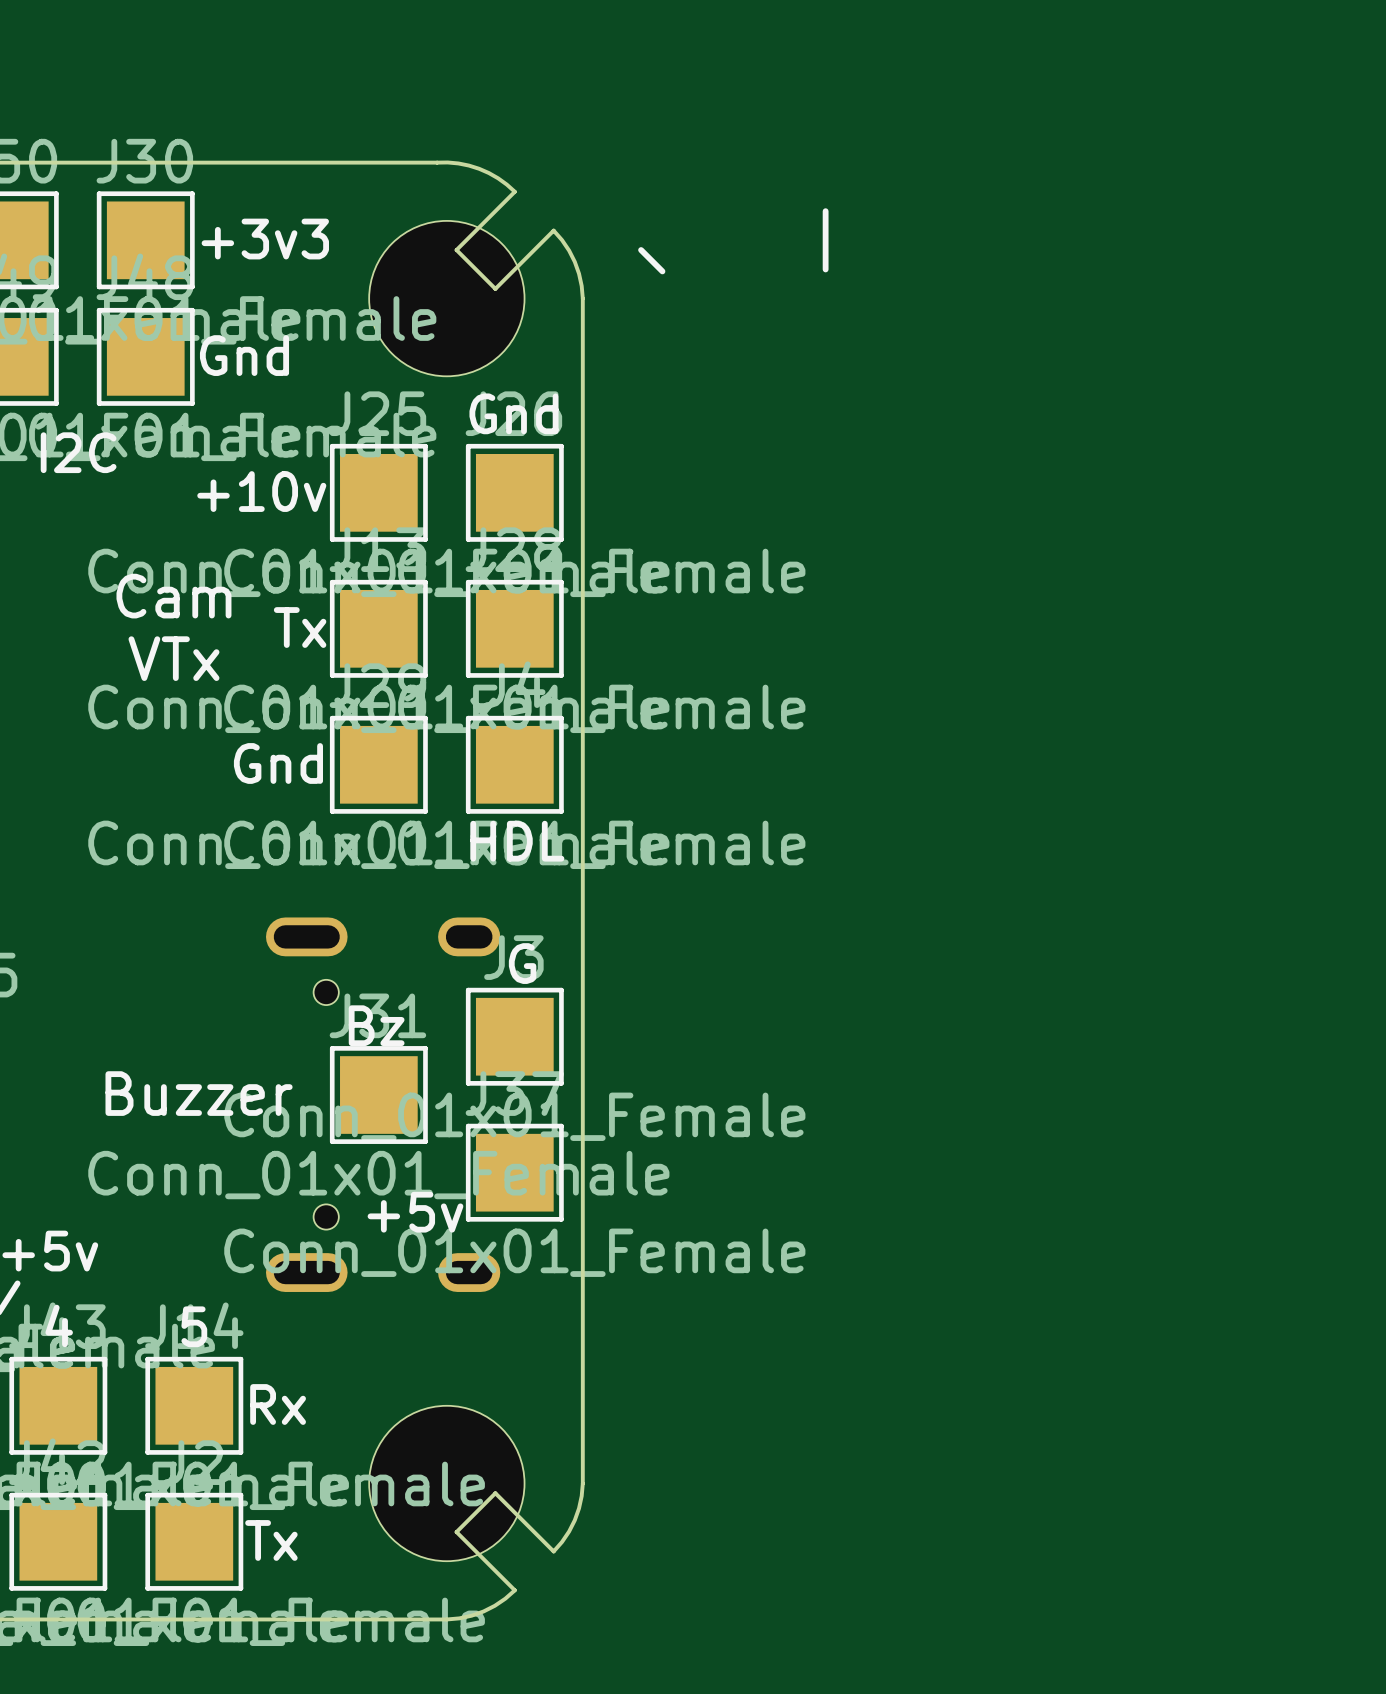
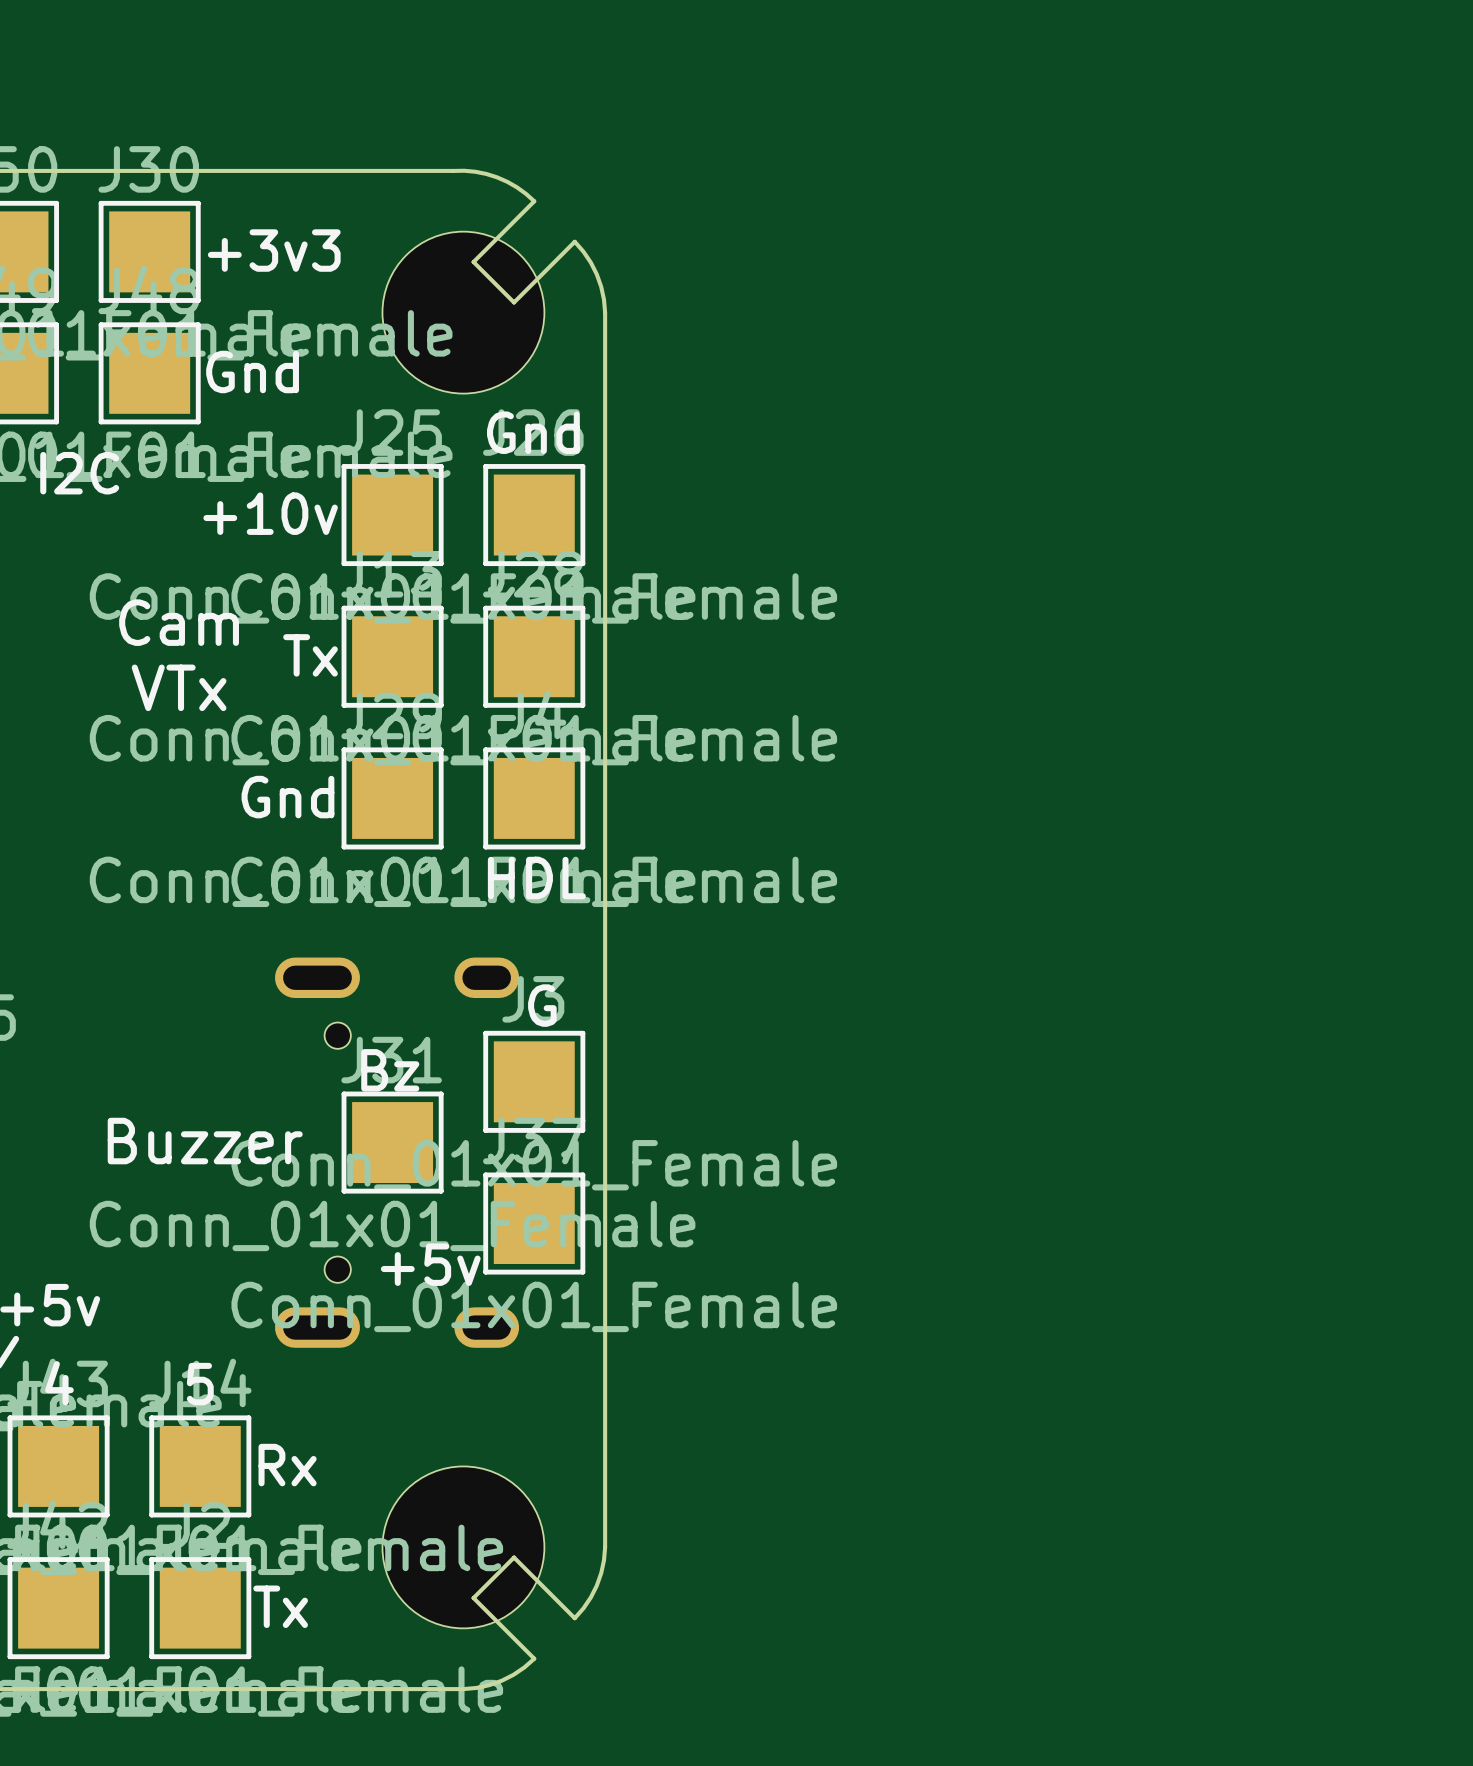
line: (825, 211) (825, 269) -> none
line: (641, 250) (662, 271) -> none

